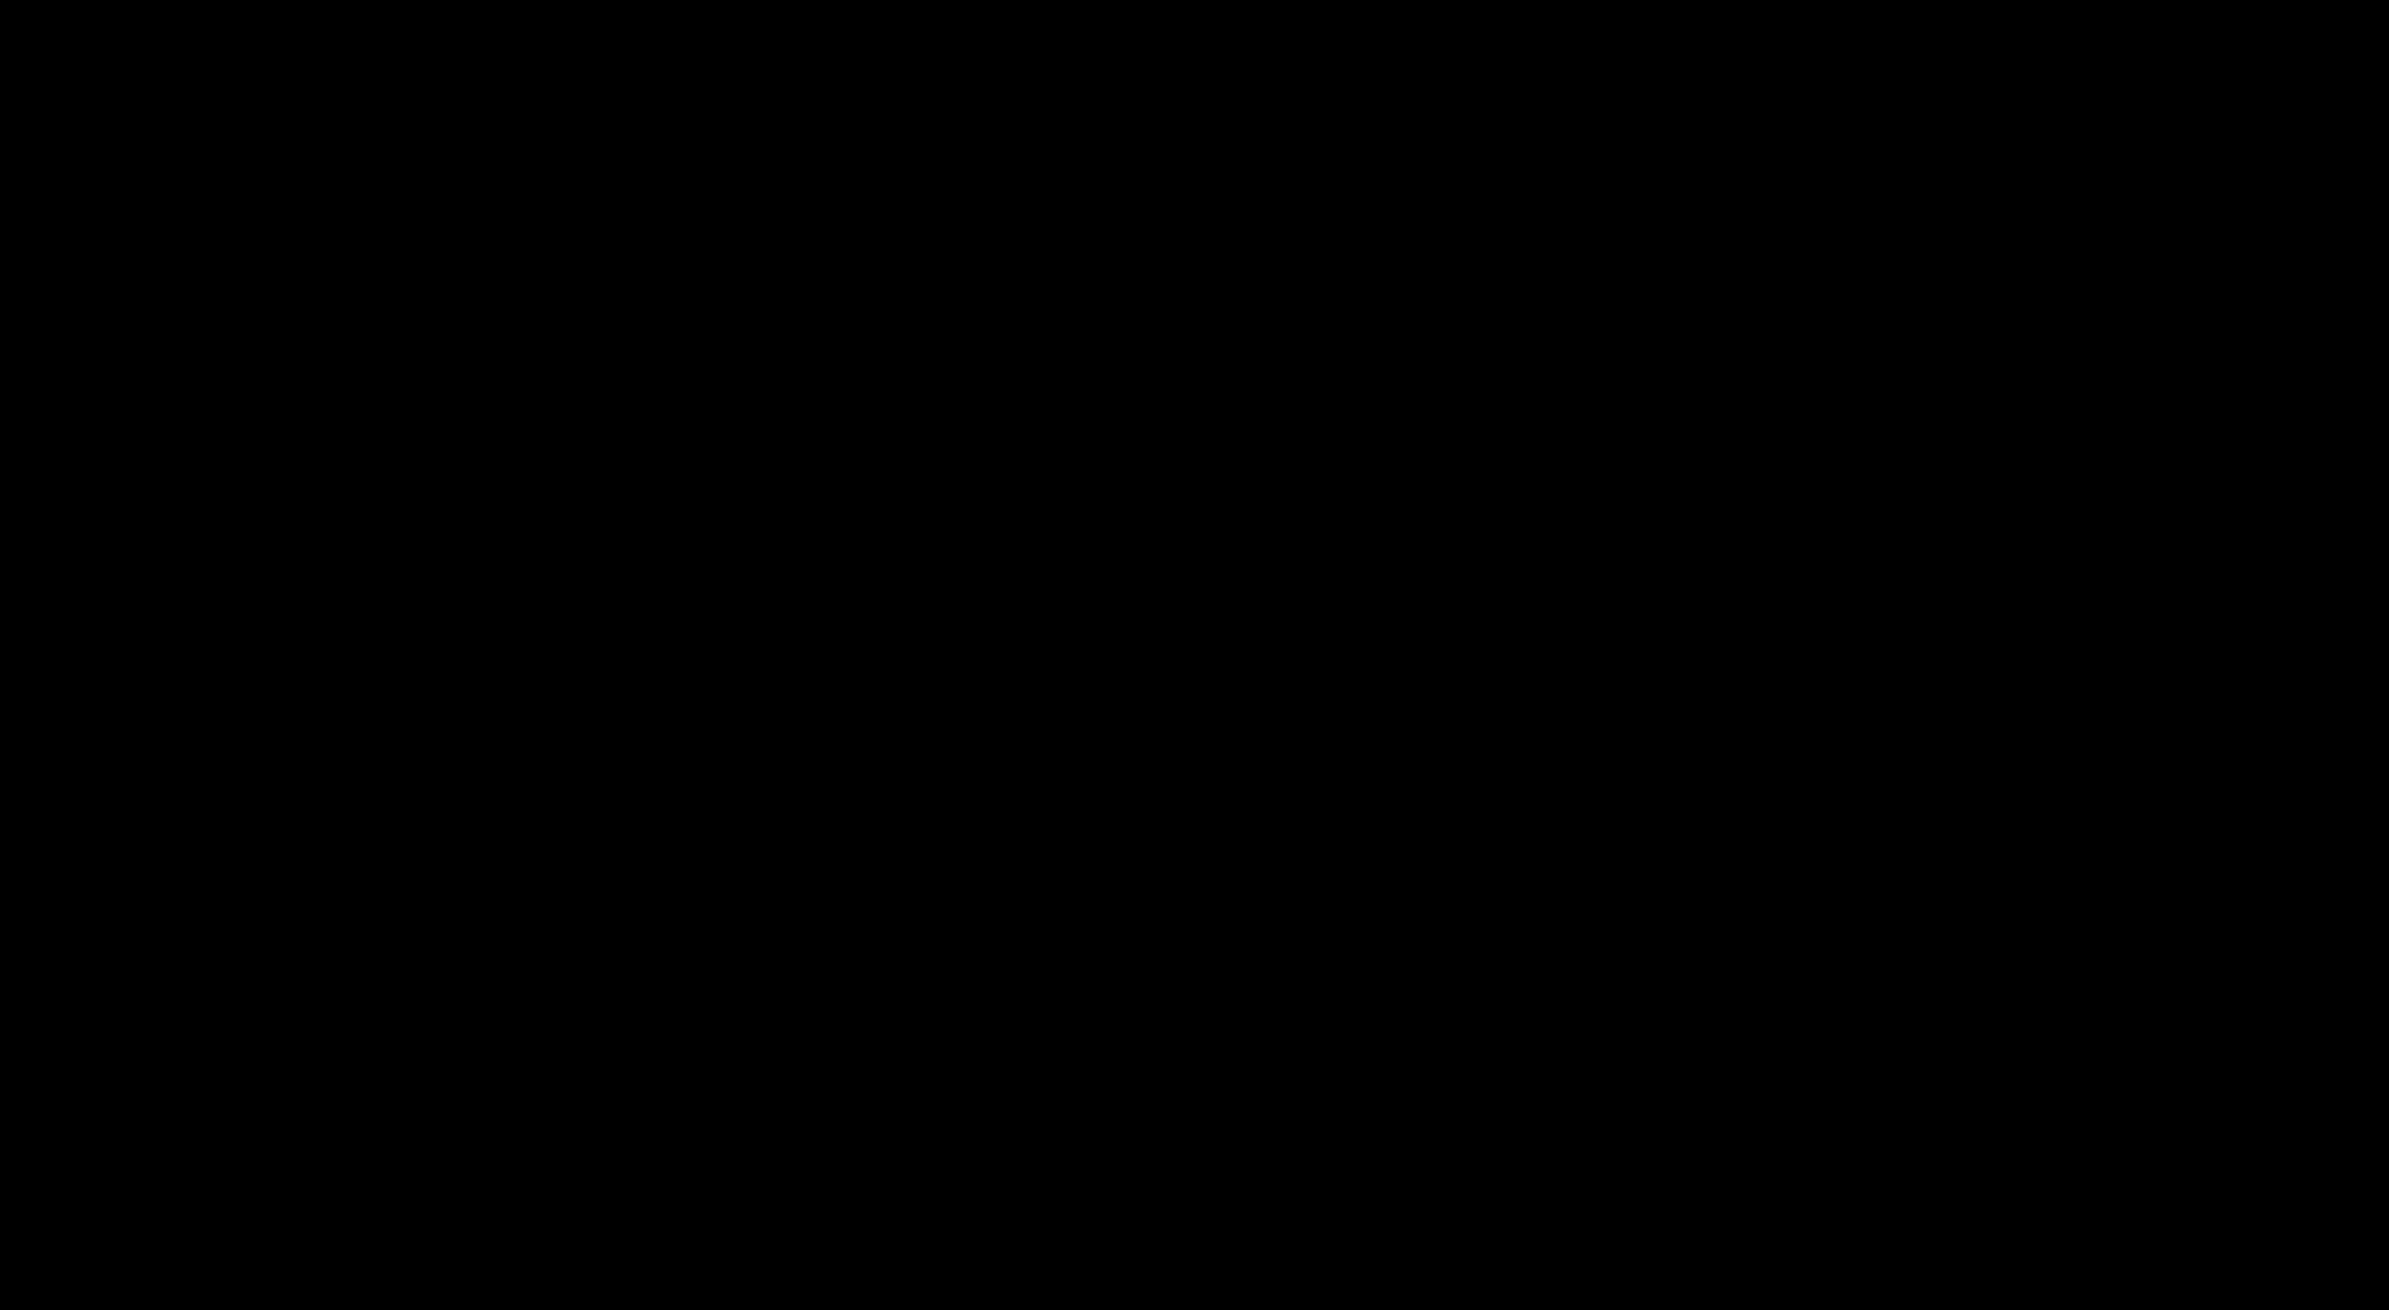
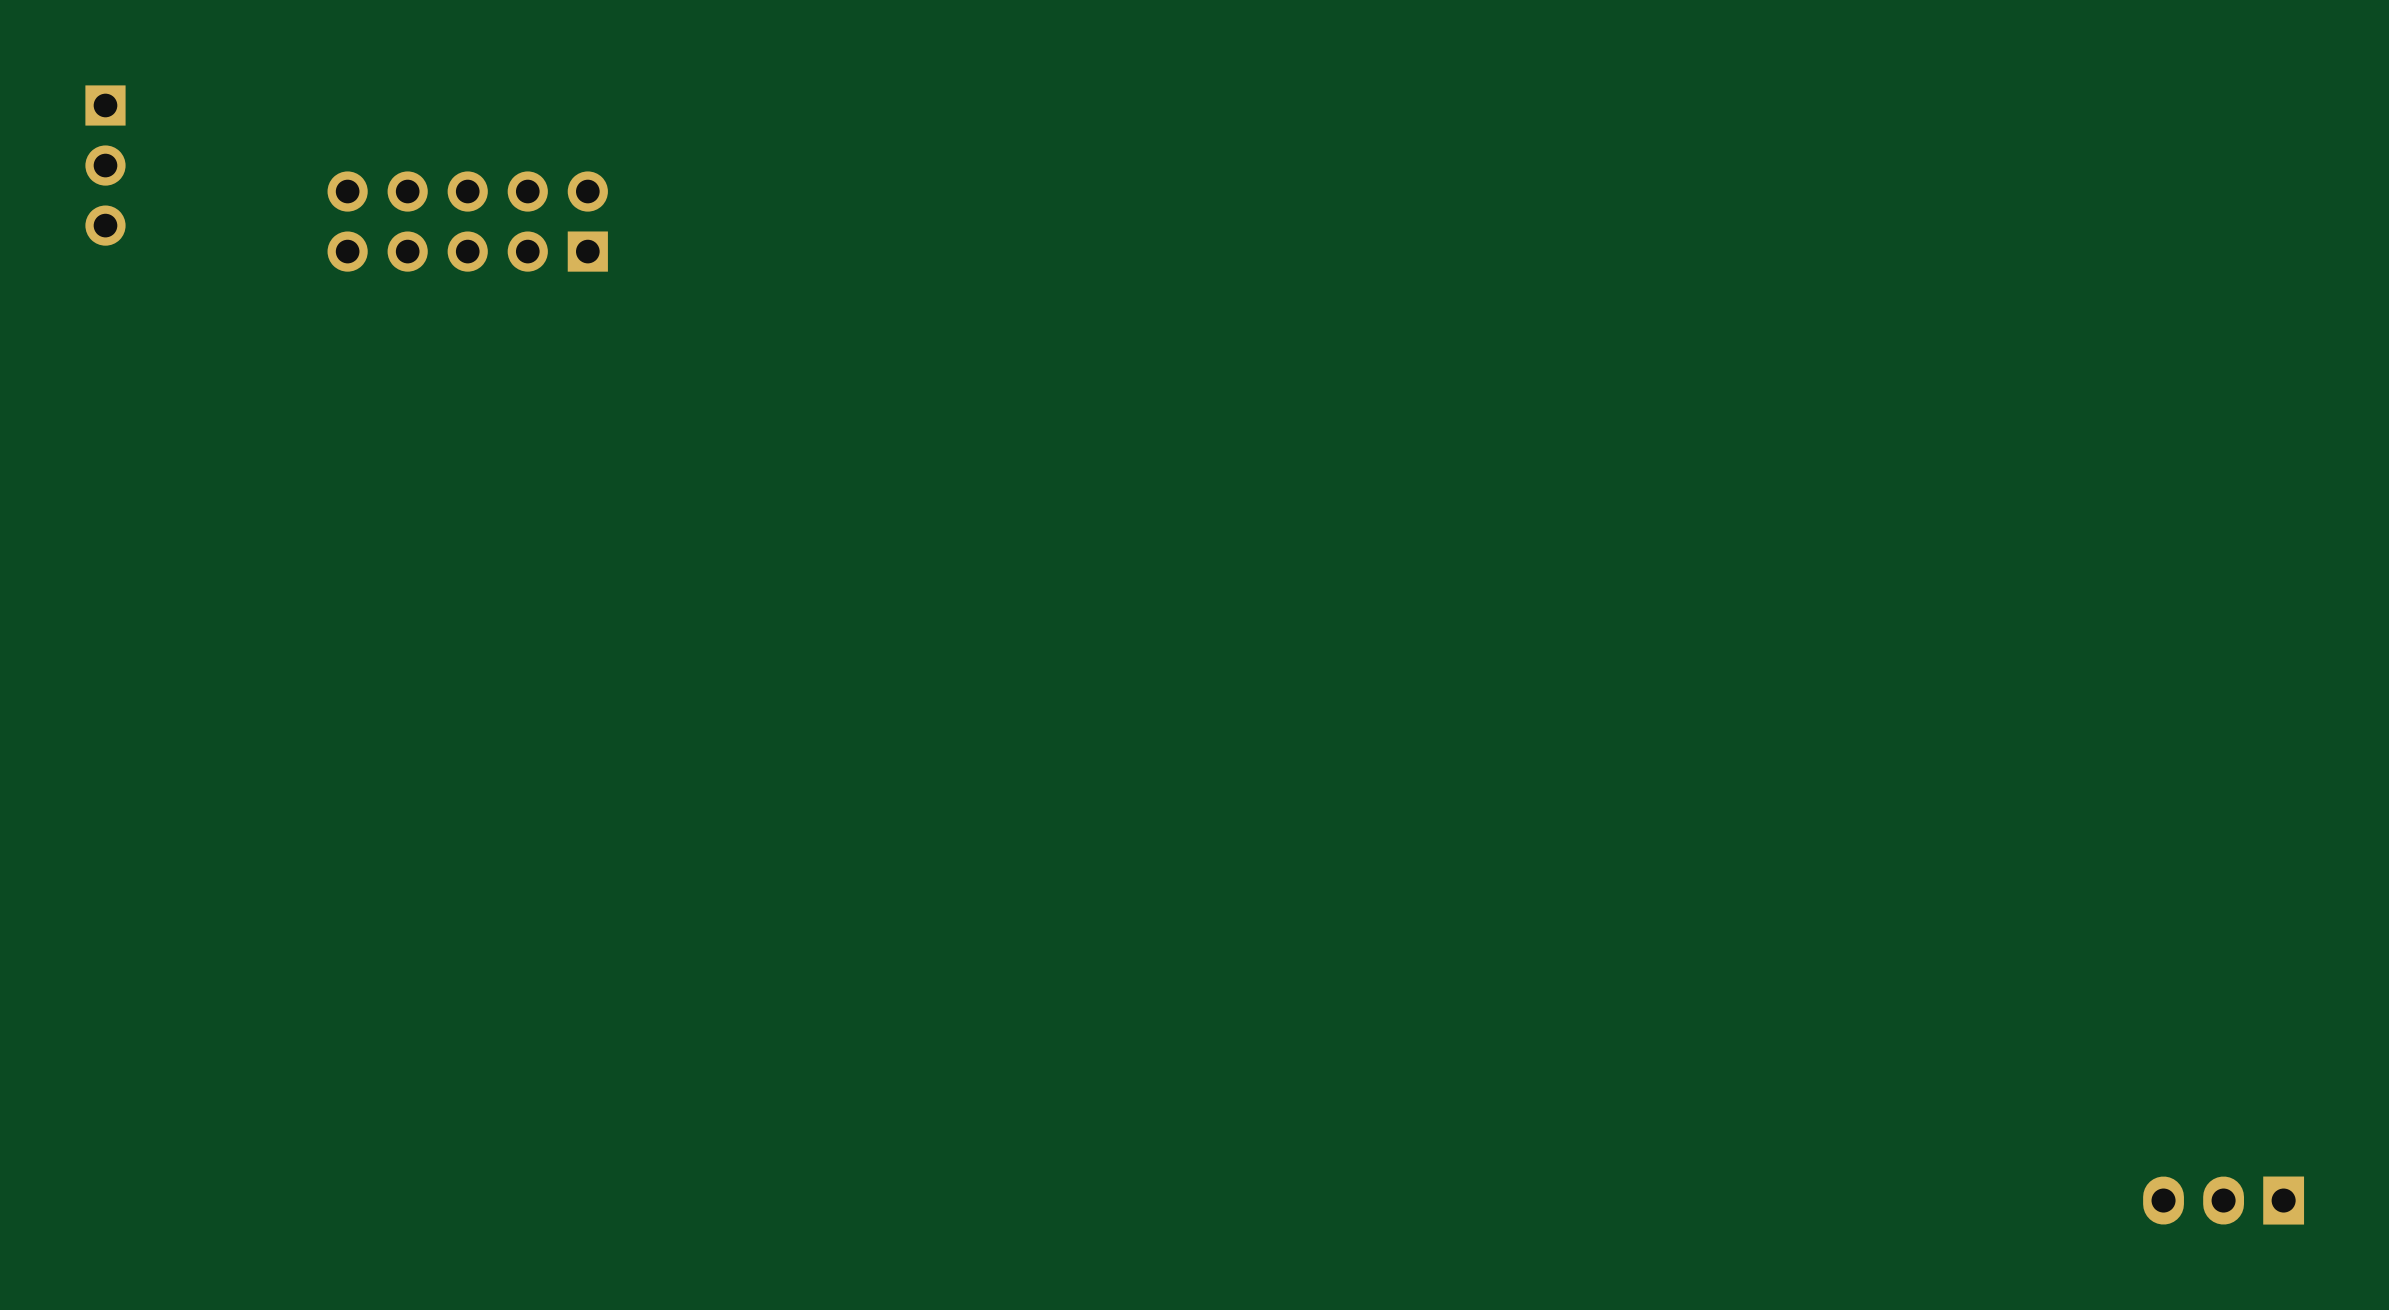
part: none -> (105, 165)
part: none -> (467, 221)
part: none -> (2223, 1200)

